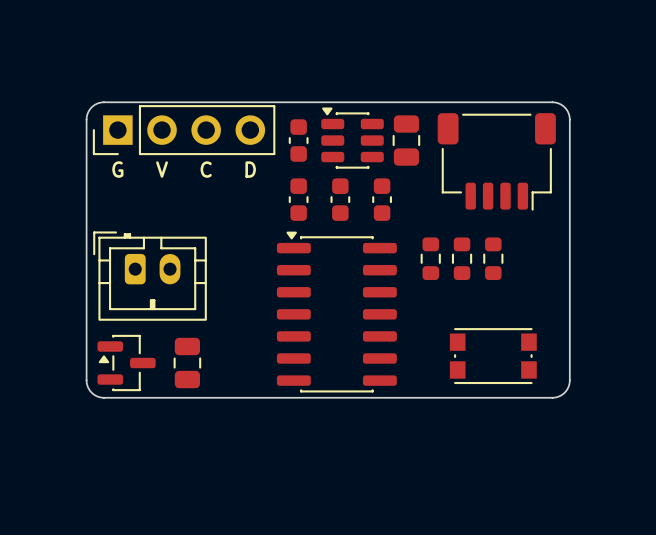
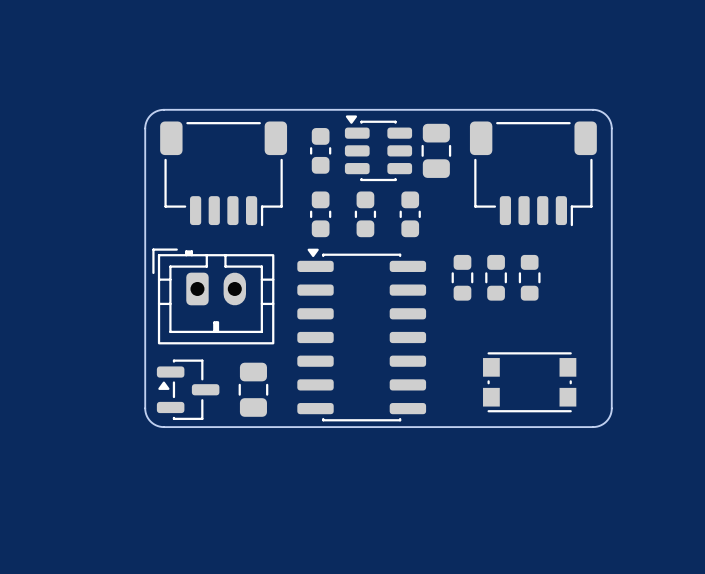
board edge: (152, 102) (100, 102) (90, 108) (86, 119) (87, 384) (91, 392) (100, 397) (152, 397) -> (163, 109) (150, 115) (145, 128) (145, 410) (150, 421) (163, 427)
part: (184, 130) -> none
part: none -> (223, 173)
text: G (117, 169) -> none
text: V (162, 169) -> none
text: C (206, 169) -> none
text: D (250, 169) -> none
part position: (150, 276) -> (213, 296)
part footprint: [173, 337, 202, 389] -> [156, 359, 220, 420]
part: (126, 363) -> none
part: none -> (253, 389)

